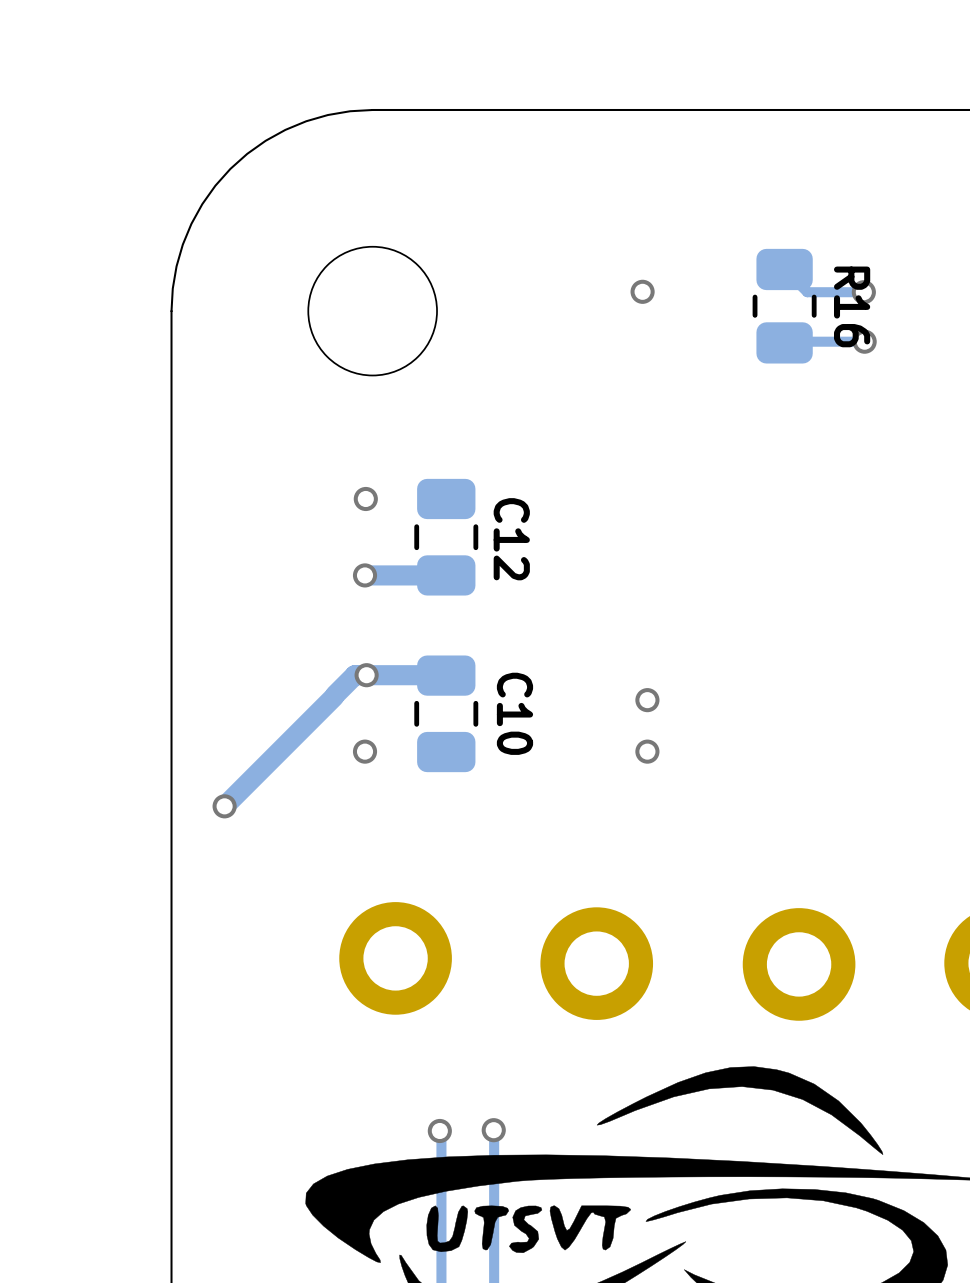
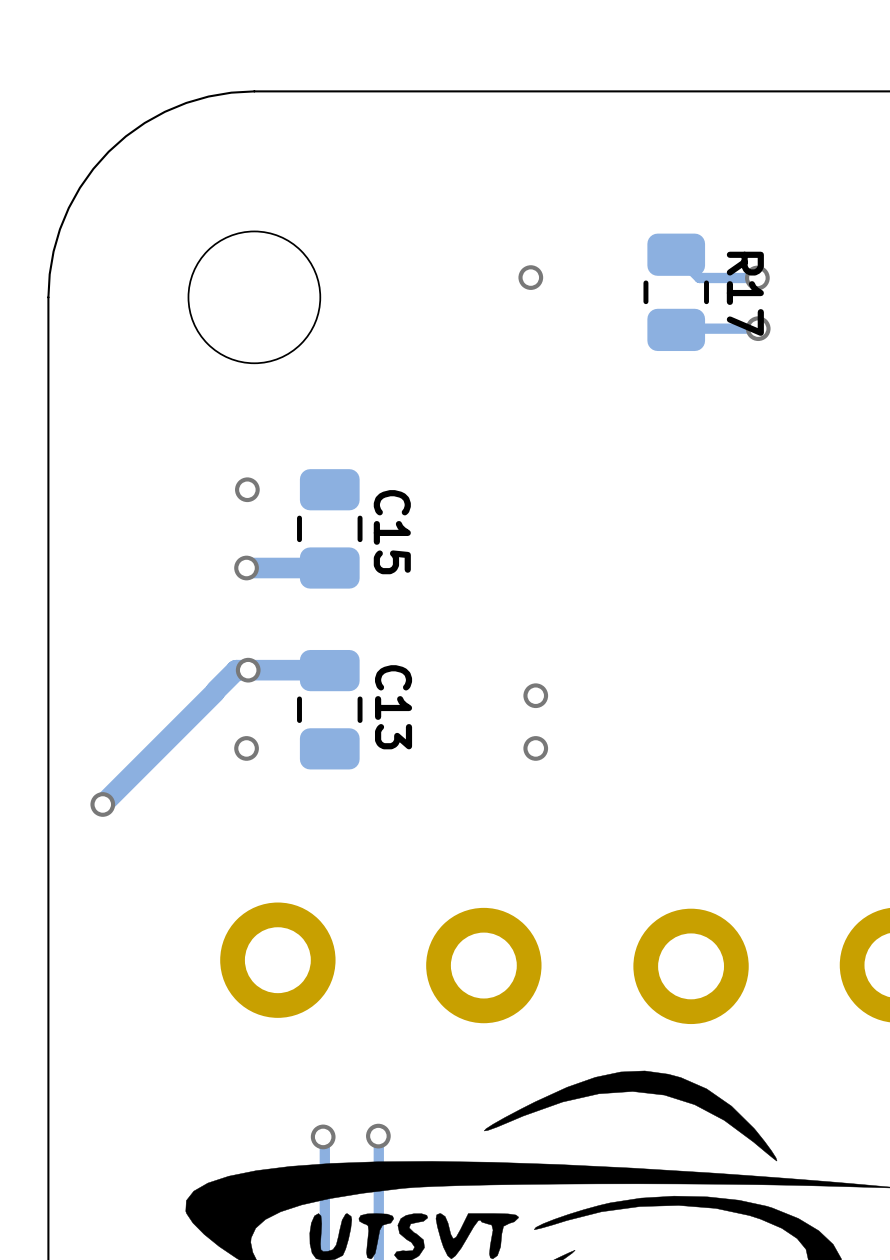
R16 name: R16 (852, 306) -> R17 (745, 293)
C12 name: C12 (511, 539) -> C15 (392, 532)
C10 name: C10 (514, 713) -> C13 (393, 707)

